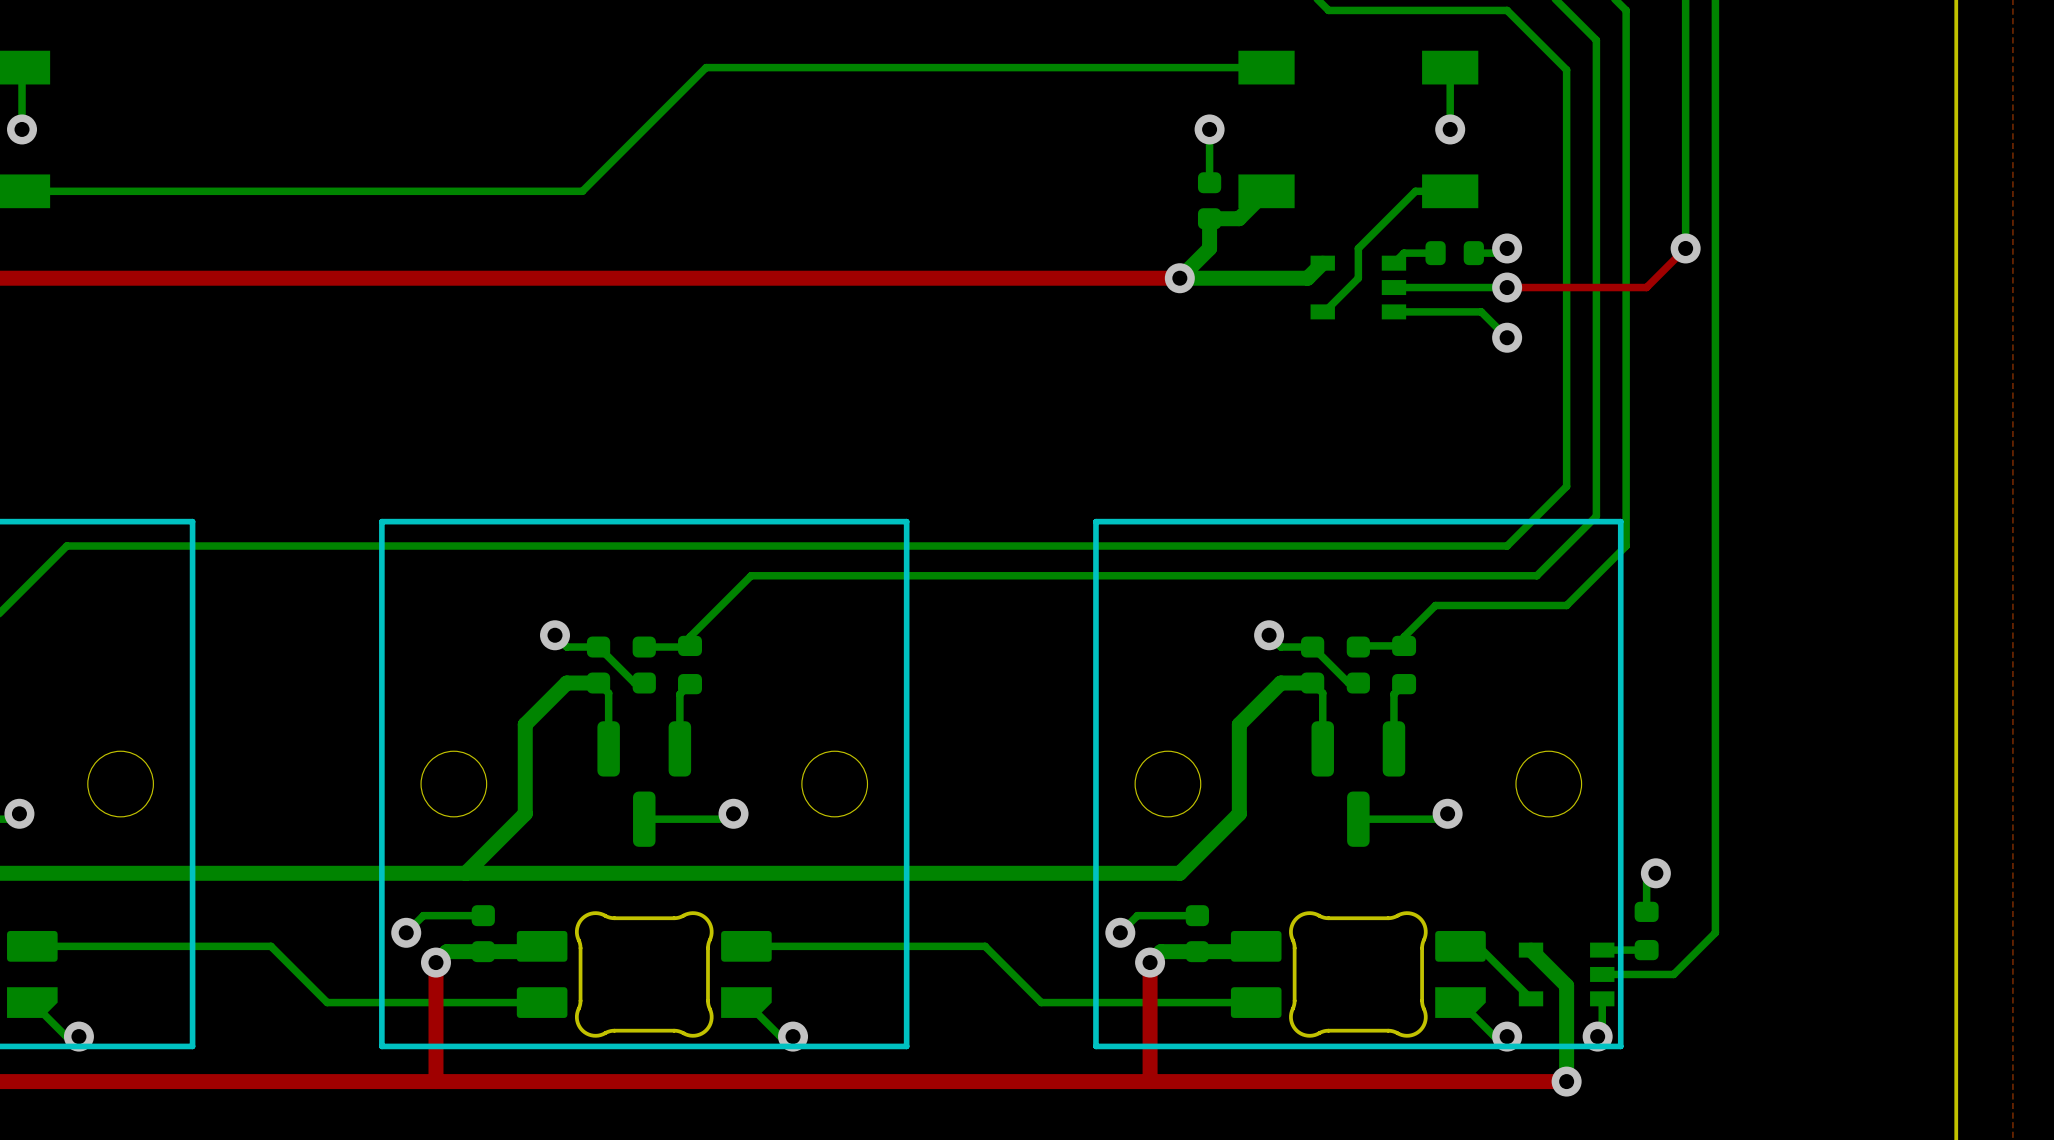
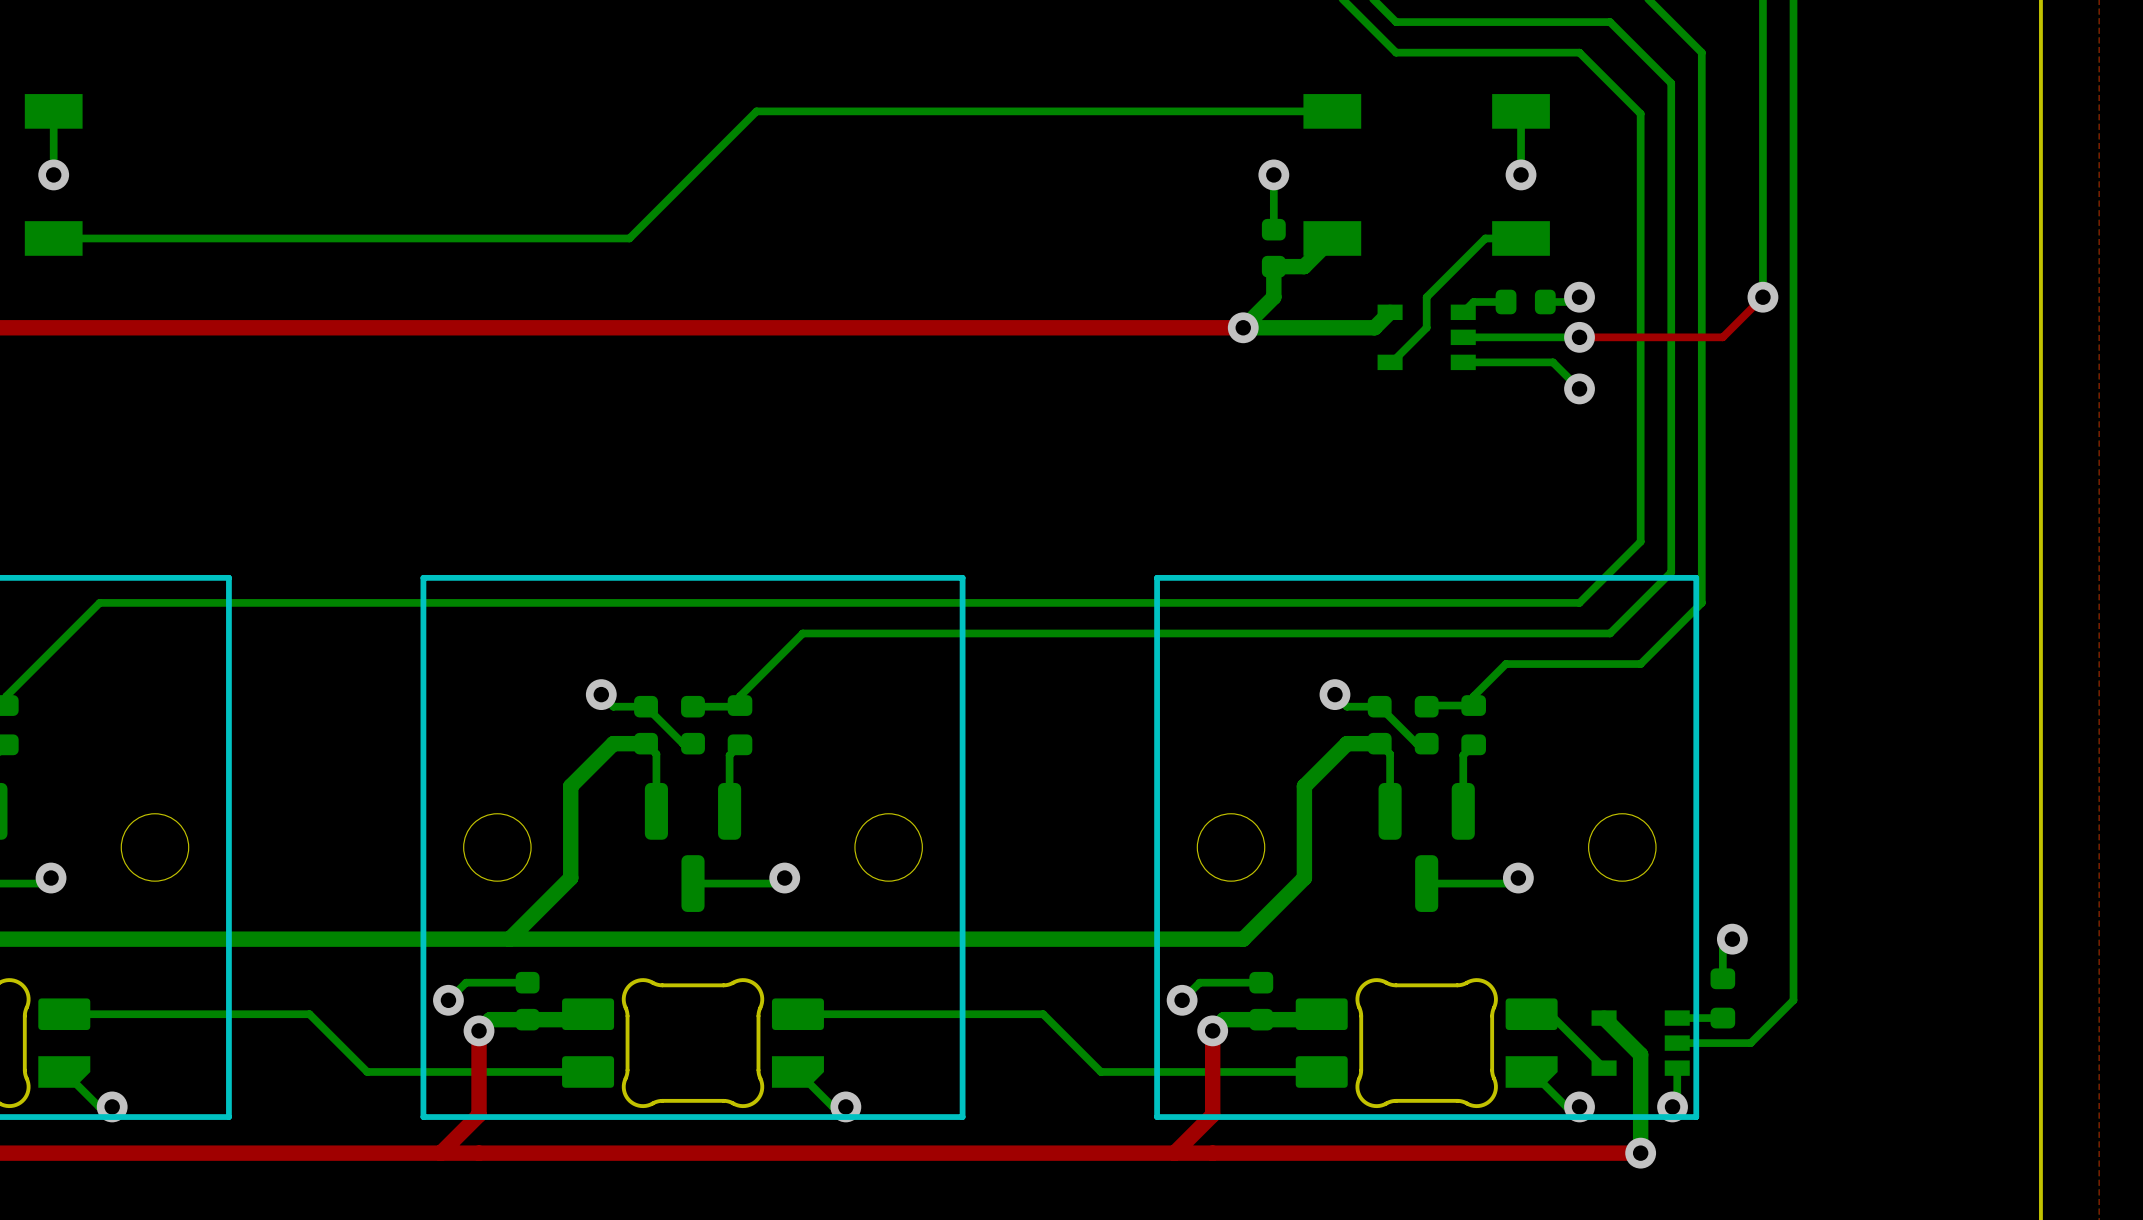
top track: (435, 1044) (435, 1081) -> (479, 1114) (440, 1153)
top track: (1150, 1044) (1150, 1081) -> (1212, 1114) (1174, 1153)

